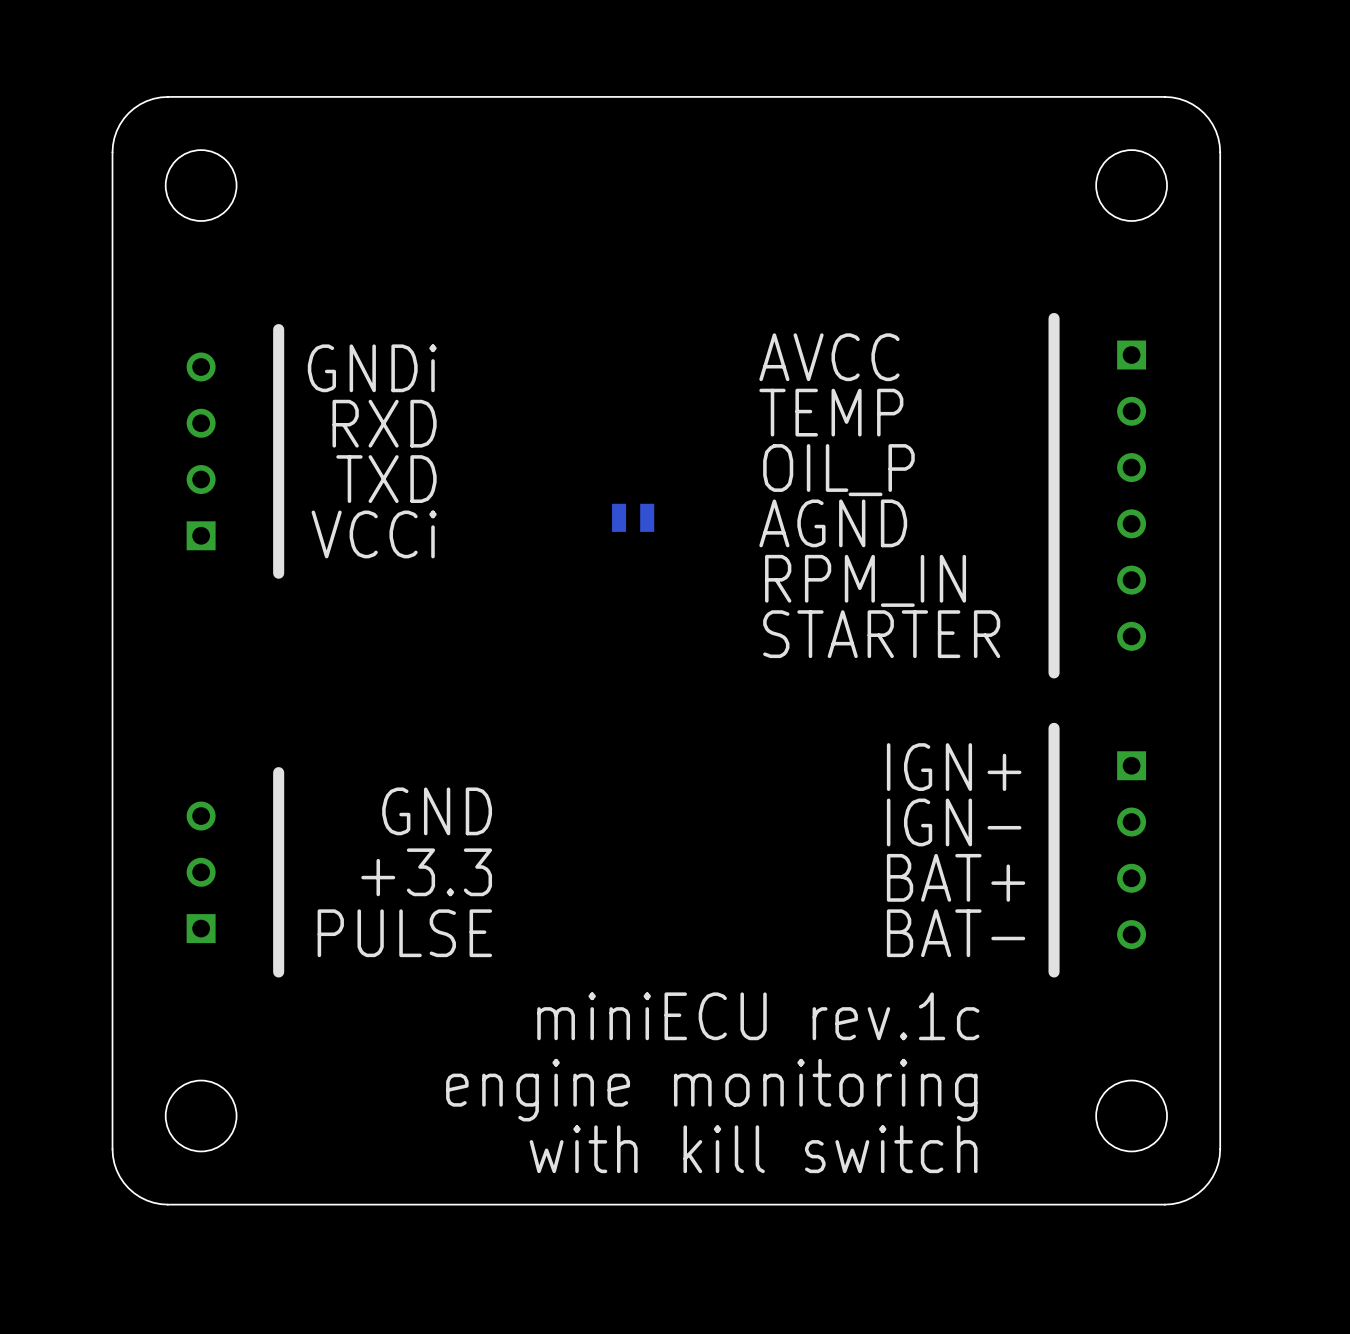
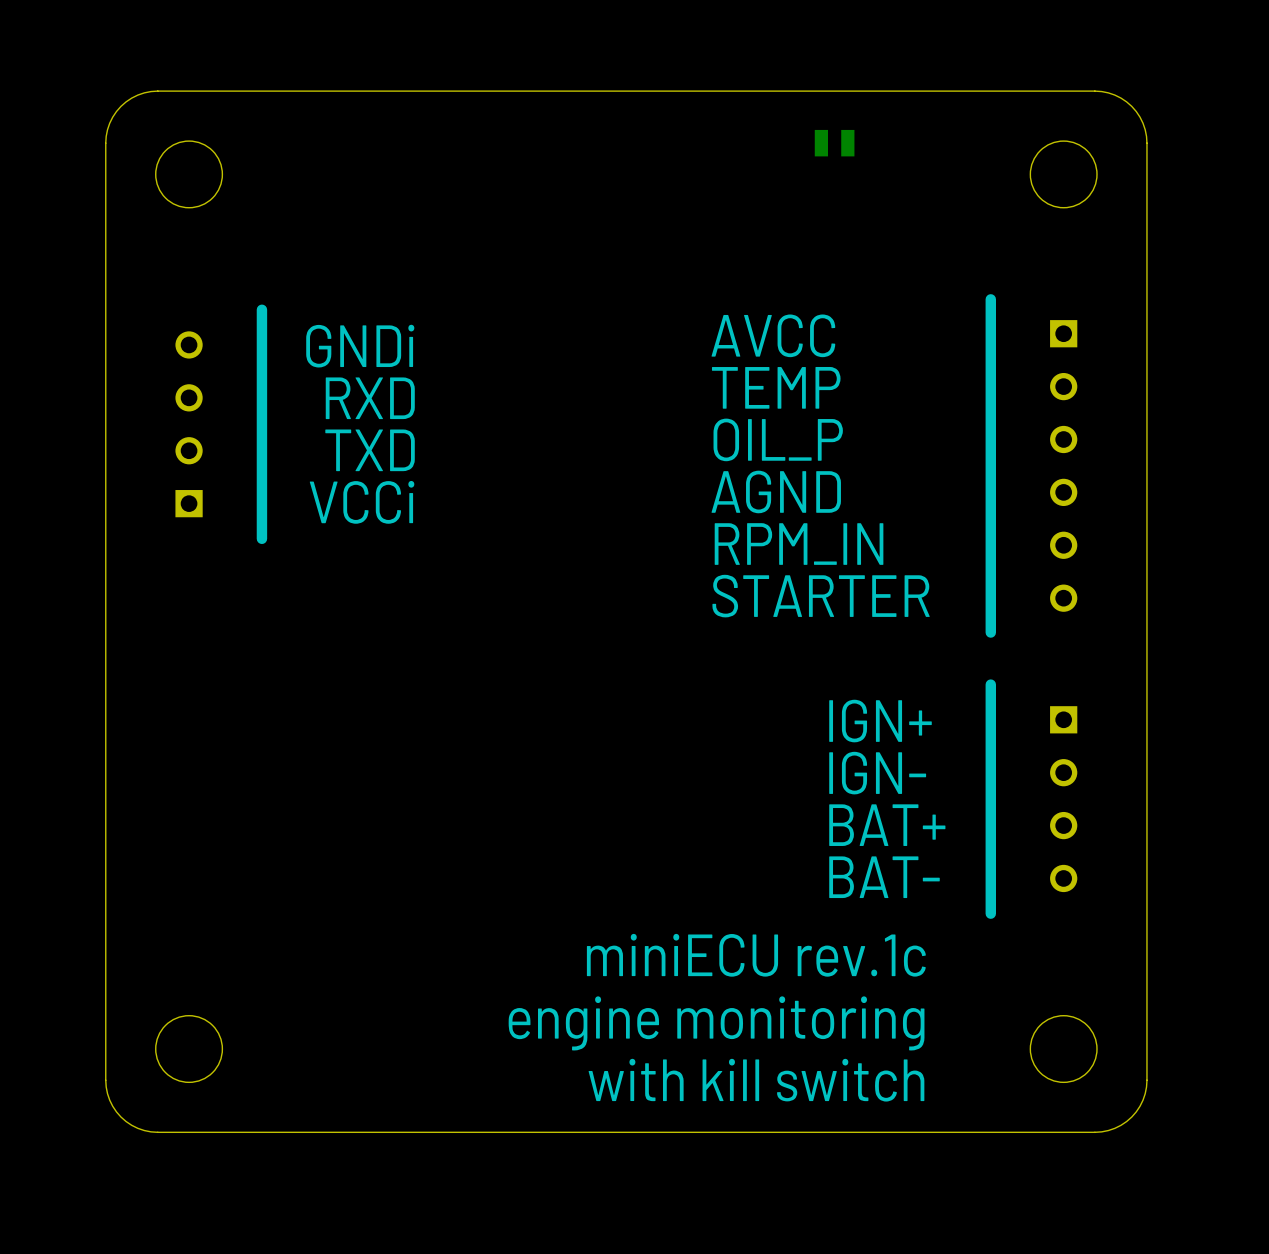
part position: (633, 517) -> (834, 143)
line: (278, 772) (278, 972) -> none
text: GND (437, 811) -> none
part: (201, 872) -> none
text: +3.3 (426, 872) -> none
text: PULSE (404, 933) -> none

